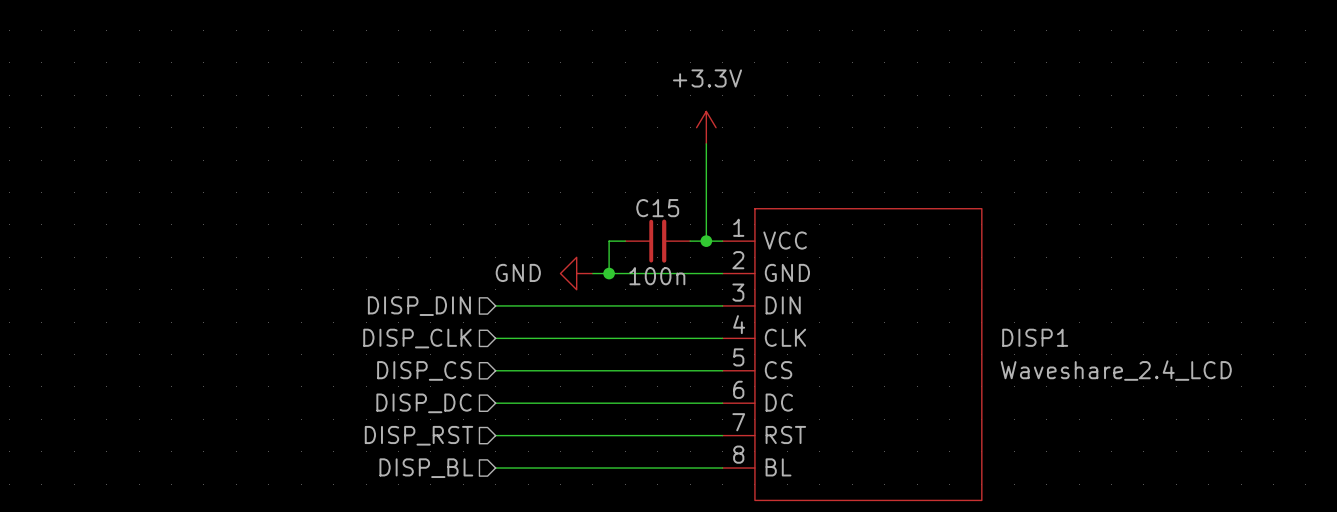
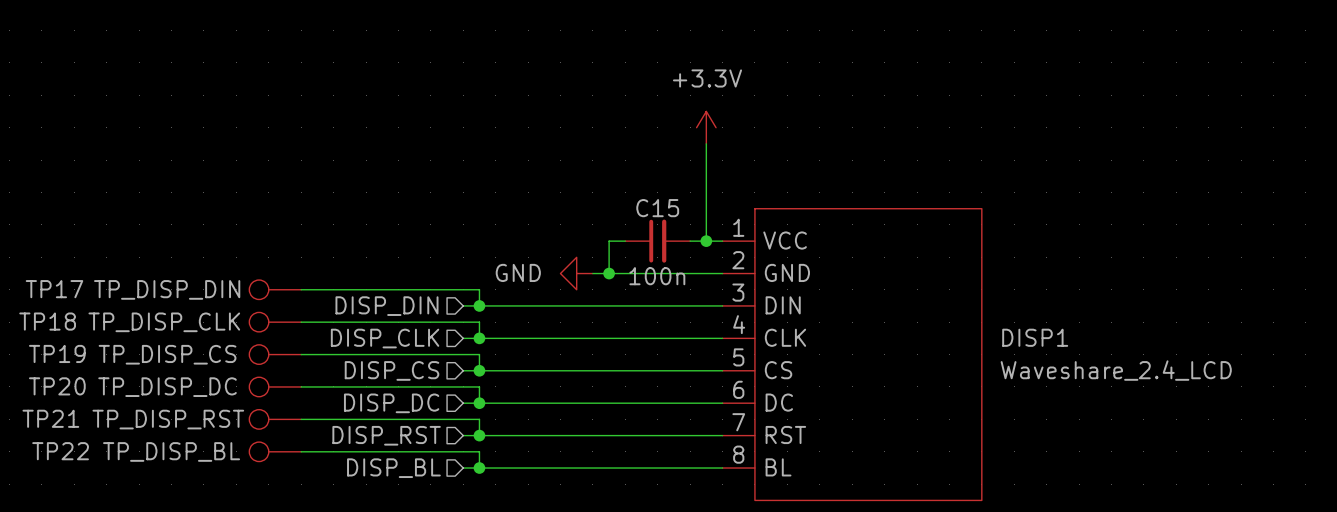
TP17: none -> TP_DISP_DIN (275, 289)
wire: none -> (301, 289) (479, 289) (479, 305)
wire: none -> (463, 305) (495, 305)
junction: none -> (479, 305)
hierarchical label position: DISP_DIN (419, 306) -> DISP_DIN (386, 306)
TP18: none -> TP_DISP_CLK (275, 322)
wire: none -> (301, 322) (479, 322) (479, 338)
hierarchical label position: DISP_CLK (417, 338) -> DISP_CLK (385, 338)
wire: none -> (463, 338) (495, 338)
junction: none -> (479, 338)
TP19: none -> TP_DISP_CS (275, 354)
wire: none -> (301, 354) (479, 354) (479, 370)
hierarchical label position: DISP_CS (424, 370) -> DISP_CS (392, 370)
wire: none -> (463, 370) (495, 370)
junction: none -> (479, 370)
TP20: none -> TP_DISP_DC (275, 386)
wire: none -> (301, 386) (479, 386) (479, 403)
hierarchical label position: DISP_DC (424, 403) -> DISP_DC (391, 403)
wire: none -> (463, 403) (495, 403)
junction: none -> (479, 403)
TP21: none -> TP_DISP_RST (275, 419)
wire: none -> (301, 419) (479, 419) (479, 435)
hierarchical label position: DISP_RST (419, 435) -> DISP_RST (386, 435)
wire: none -> (463, 435) (495, 435)
junction: none -> (479, 435)
TP22: none -> TP_DISP_BL (275, 451)
wire: none -> (301, 451) (479, 451) (479, 468)
hierarchical label position: DISP_BL (426, 468) -> DISP_BL (393, 468)
wire: none -> (463, 468) (495, 468)
junction: none -> (479, 468)

